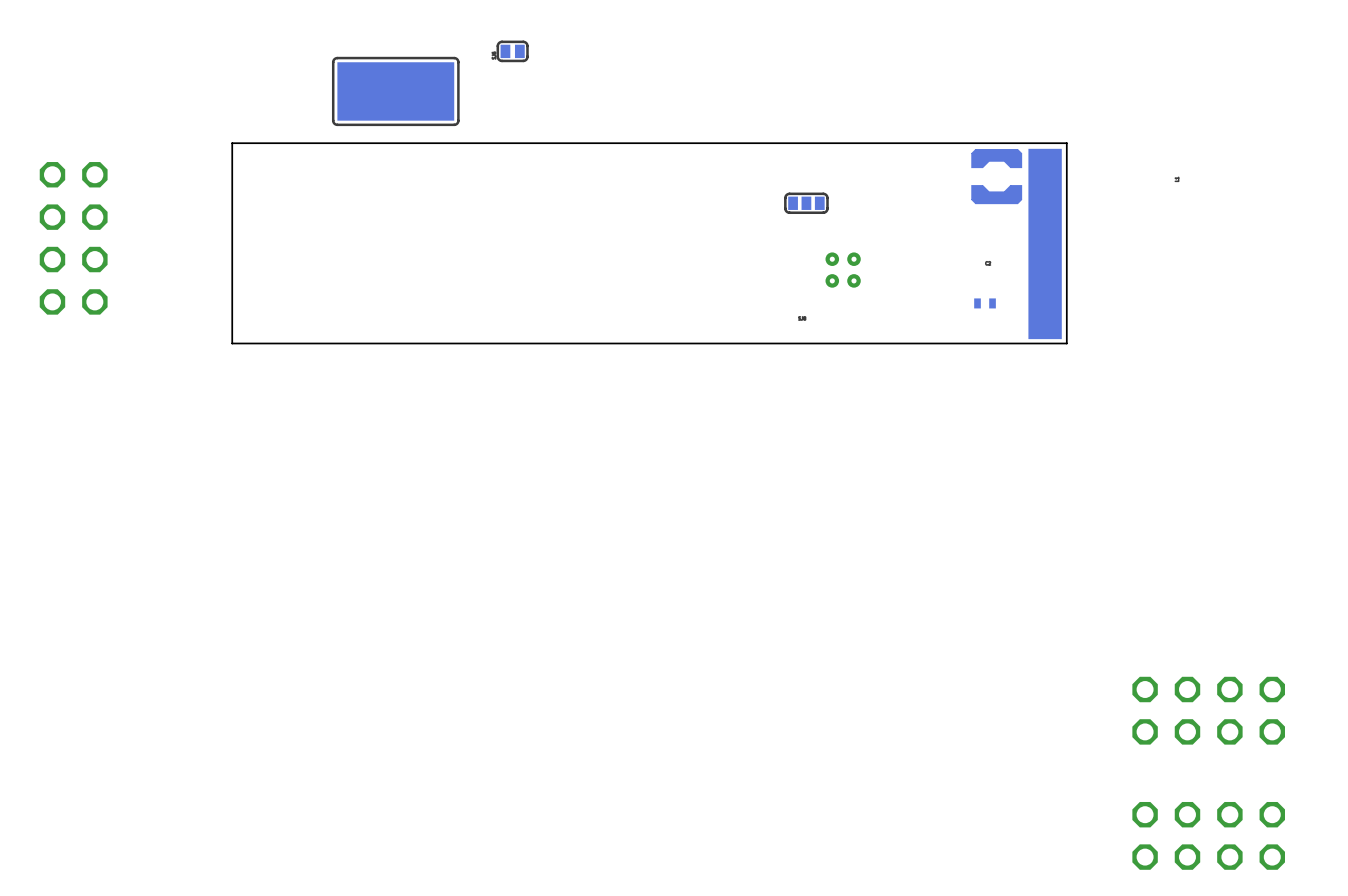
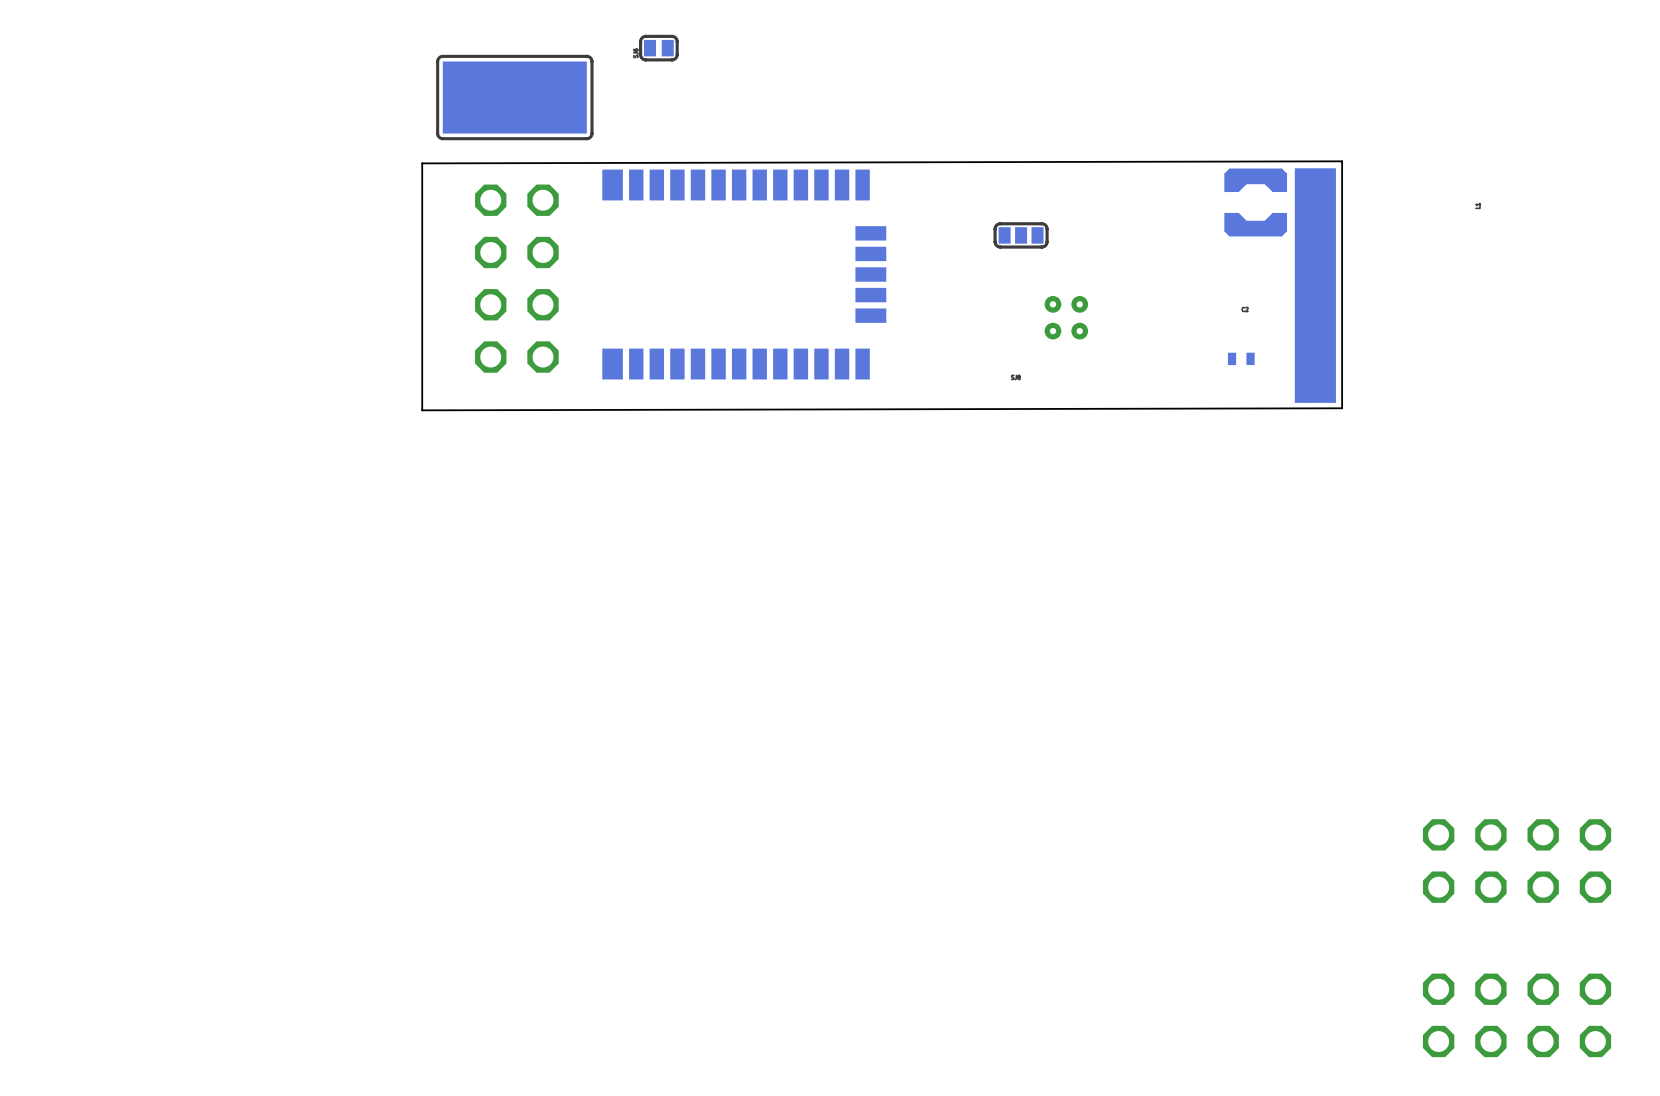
board edge: (1066, 143) (232, 143) (232, 343) (1066, 343) -> (1342, 161) (422, 163) (422, 410) (1342, 408)
part: none -> (744, 274)
part position: (73, 238) -> (516, 278)

